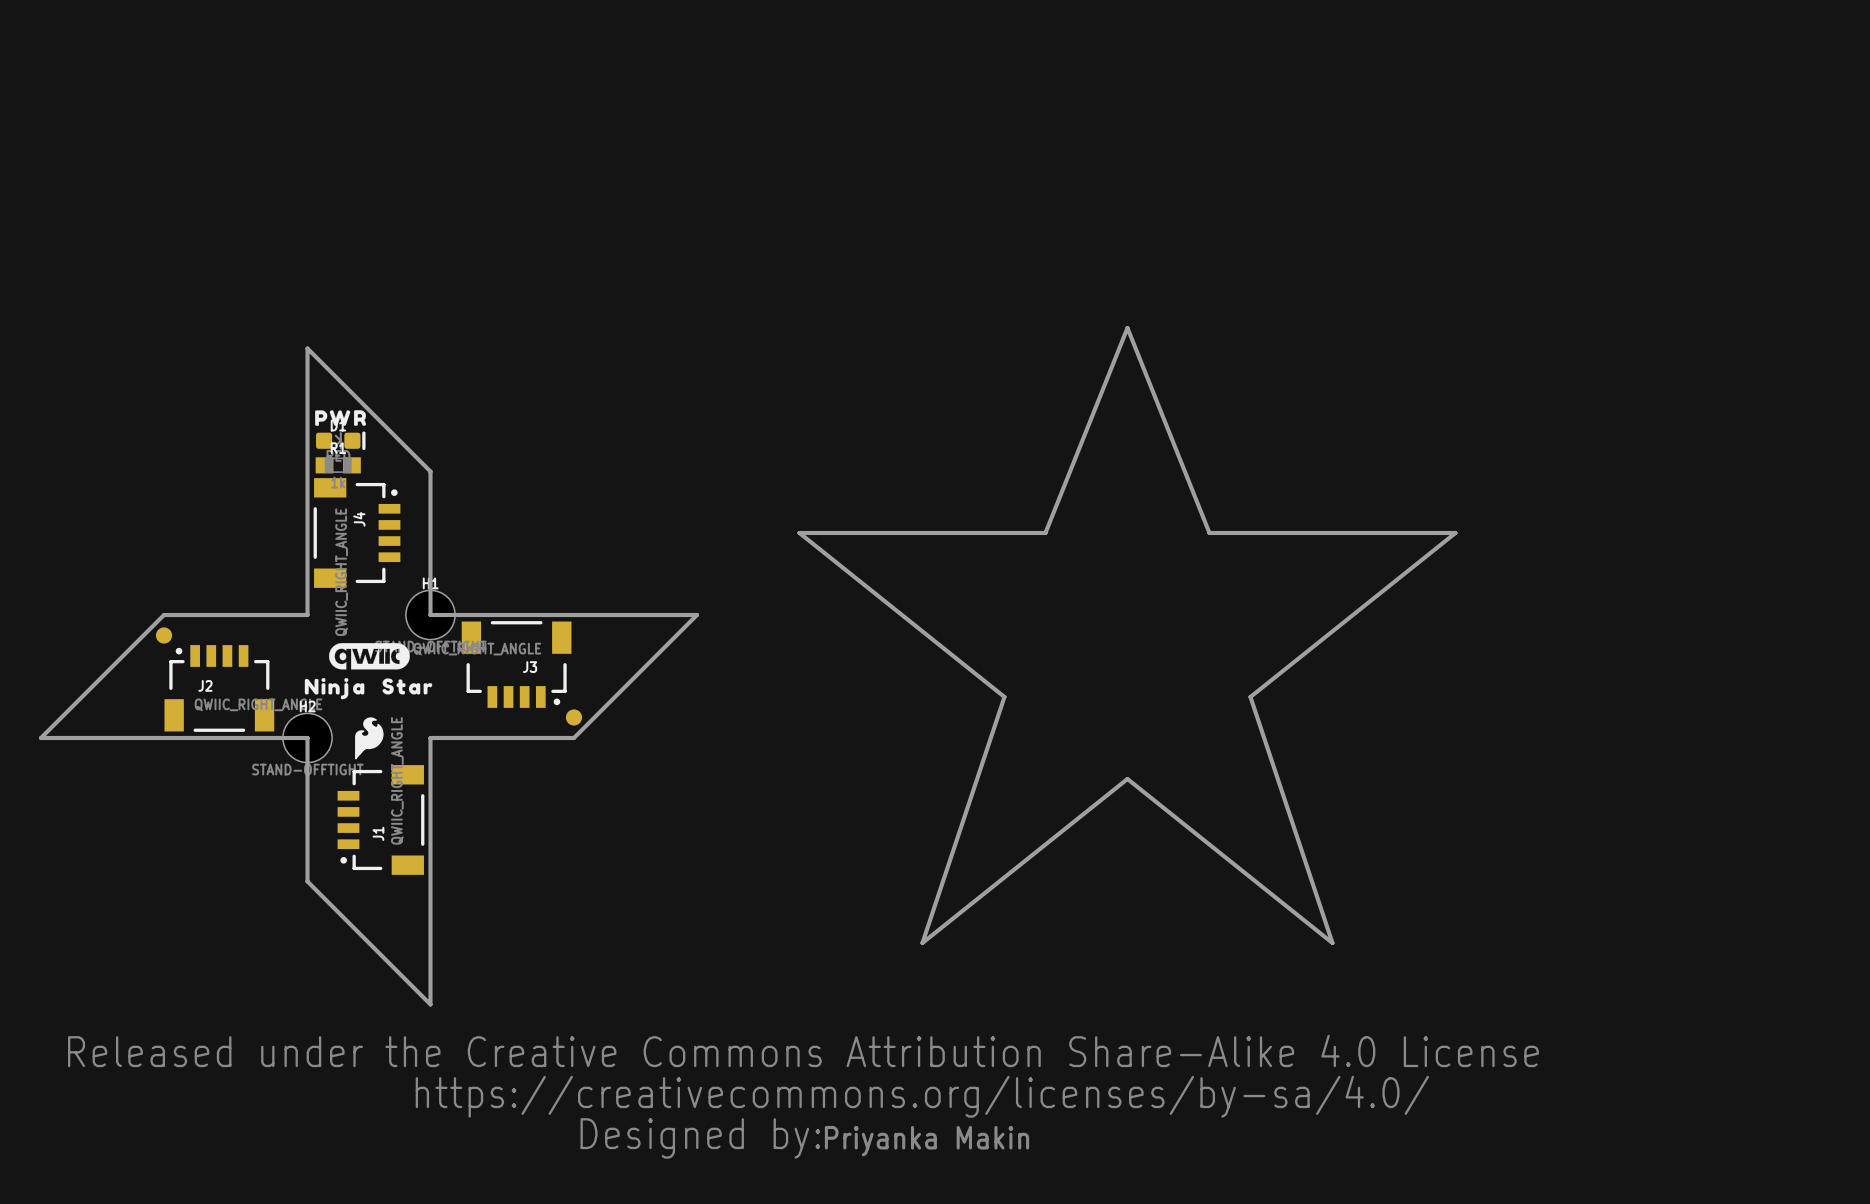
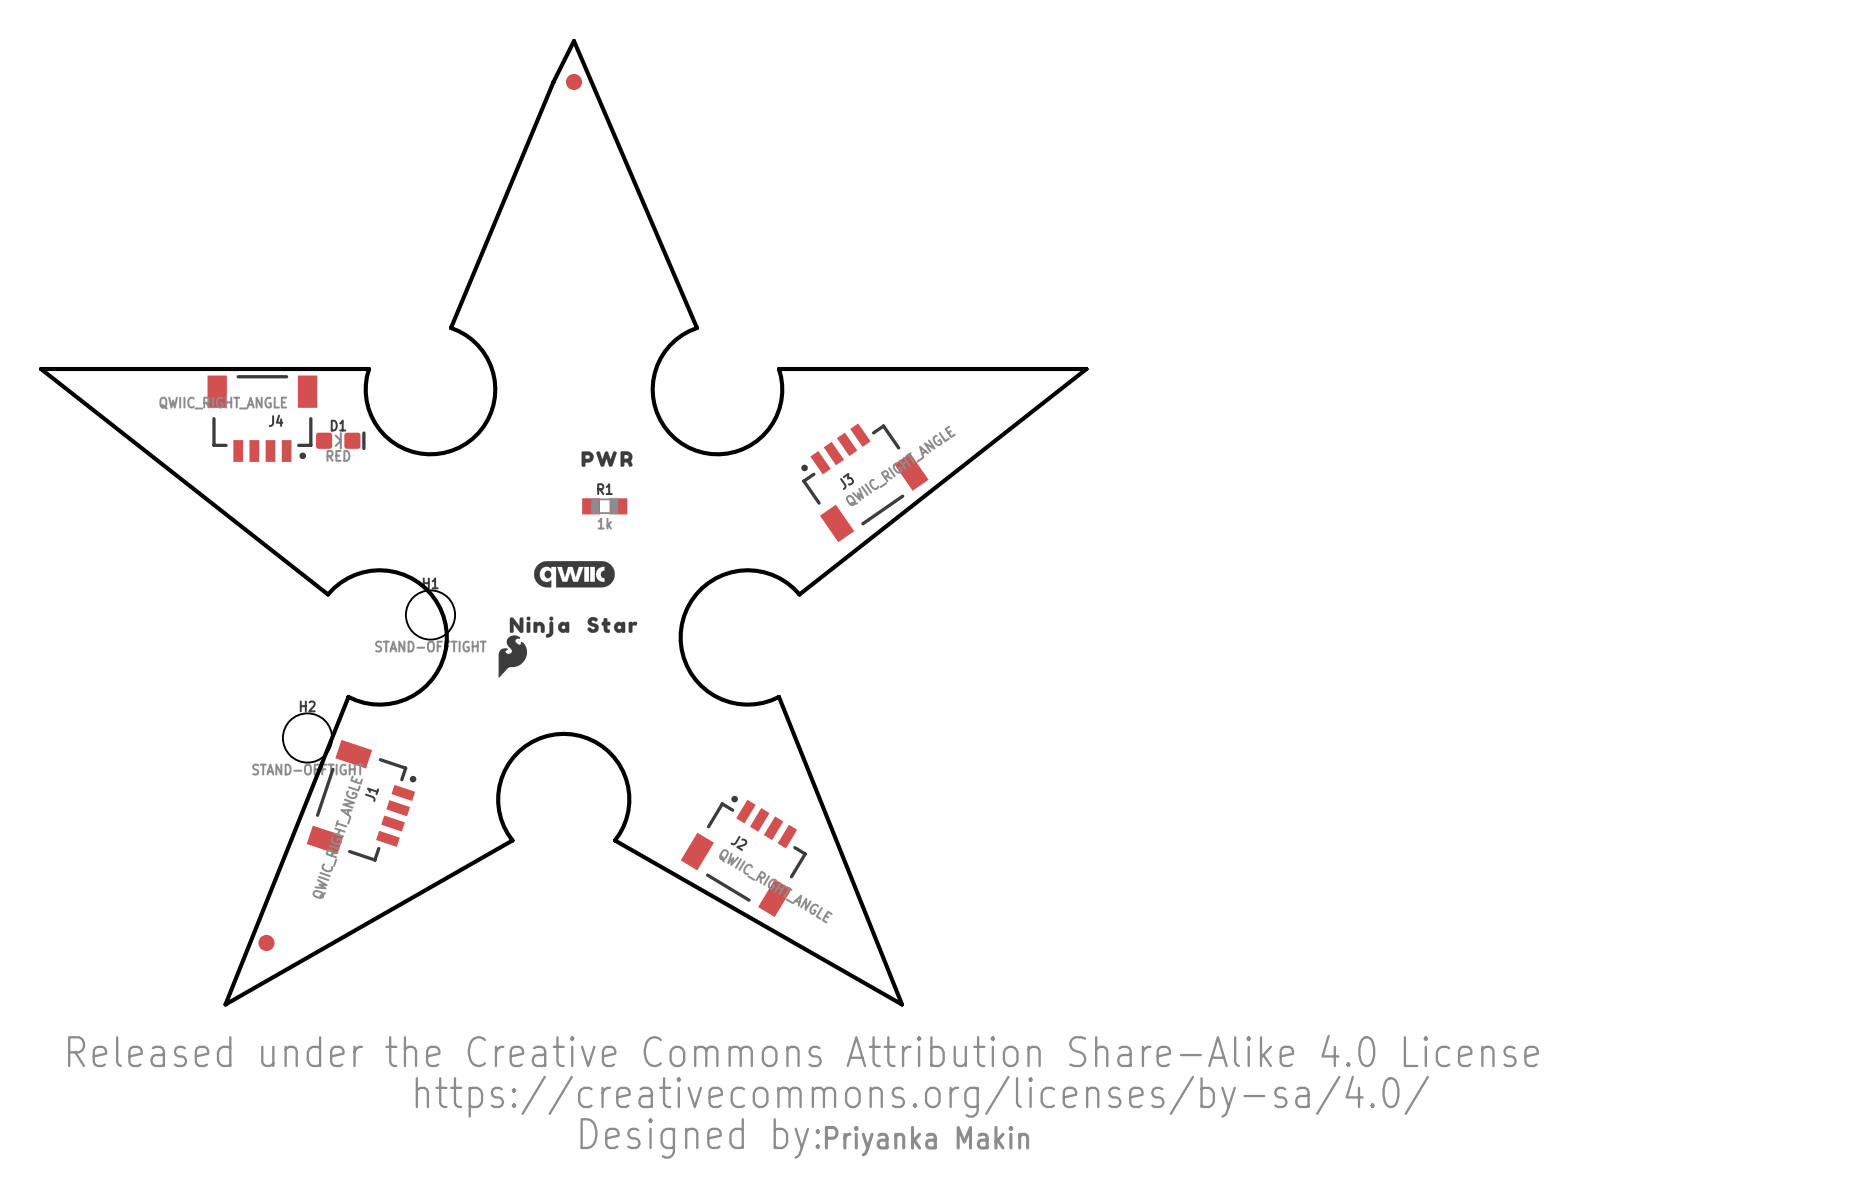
board edge: none -> (573, 41) (696, 328) (676, 339) (665, 351) (657, 365) (653, 380) (653, 396) (656, 412) (669, 432) (681, 443) (703, 452) (719, 454) (743, 449) (756, 441) (768, 429) (779, 408) (782, 384) (778, 369) (1086, 369) (799, 594) (787, 583) (772, 574) (756, 570) (739, 570) (723, 574) (708, 582) (696, 594) (684, 616) (680, 632) (683, 657) (690, 672) (707, 691) (722, 699) (746, 704) (763, 702) (778, 696) (901, 1004) (614, 840) (623, 826) (628, 810) (628, 786) (622, 771) (608, 751) (595, 741) (579, 735) (563, 733) (547, 735) (532, 741) (519, 751) (504, 771) (499, 786) (499, 810) (503, 826) (512, 840) (225, 1004) (348, 696) (364, 702) (380, 704) (405, 699) (419, 691) (436, 672) (443, 657) (446, 632) (443, 616) (431, 594) (418, 582) (404, 574) (387, 570) (371, 570) (354, 574) (340, 583) (328, 594) (41, 369) (369, 369) (365, 384) (368, 408) (379, 429) (391, 441) (404, 449) (428, 454) (444, 452) (466, 443) (478, 432) (491, 412) (494, 396) (494, 380) (490, 365) (482, 351) (471, 339) (451, 328) (553, 82) (573, 41)
part: none -> (573, 82)
board edge: (1127, 328) (1045, 532) (799, 532) (1004, 696) (922, 942) (1127, 778) (1332, 942) (1250, 696) (1455, 532) (1209, 532) (1127, 328) -> none
board edge: (307, 348) (307, 614) (164, 614) (41, 737) (307, 737) (307, 881) (430, 1004) (430, 737) (573, 737) (696, 614) (430, 614) (430, 471) (307, 348) -> none
drawing position: (340, 418) -> (607, 459)
R1 position: (338, 465) -> (604, 506)
J4 rotation: 0° (357, 532) -> 90° clockwise (262, 418)
J4 position: (357, 532) -> (262, 418)
part: (164, 635) -> none
drawing position: (369, 656) -> (574, 574)
J3 rotation: 0° (516, 664) -> 145.3° clockwise (864, 482)
J3 position: (516, 664) -> (864, 482)
drawing position: (407, 686) -> (612, 624)
J2 rotation: 0° (219, 688) -> 31.1° clockwise (743, 856)
J2 position: (219, 688) -> (743, 856)
drawing position: (334, 688) -> (539, 627)
part: (573, 717) -> none
drawing position: (369, 738) -> (512, 656)
J1 rotation: 0° (381, 819) -> 161.5° counterclockwise (361, 800)
part: none -> (266, 942)

